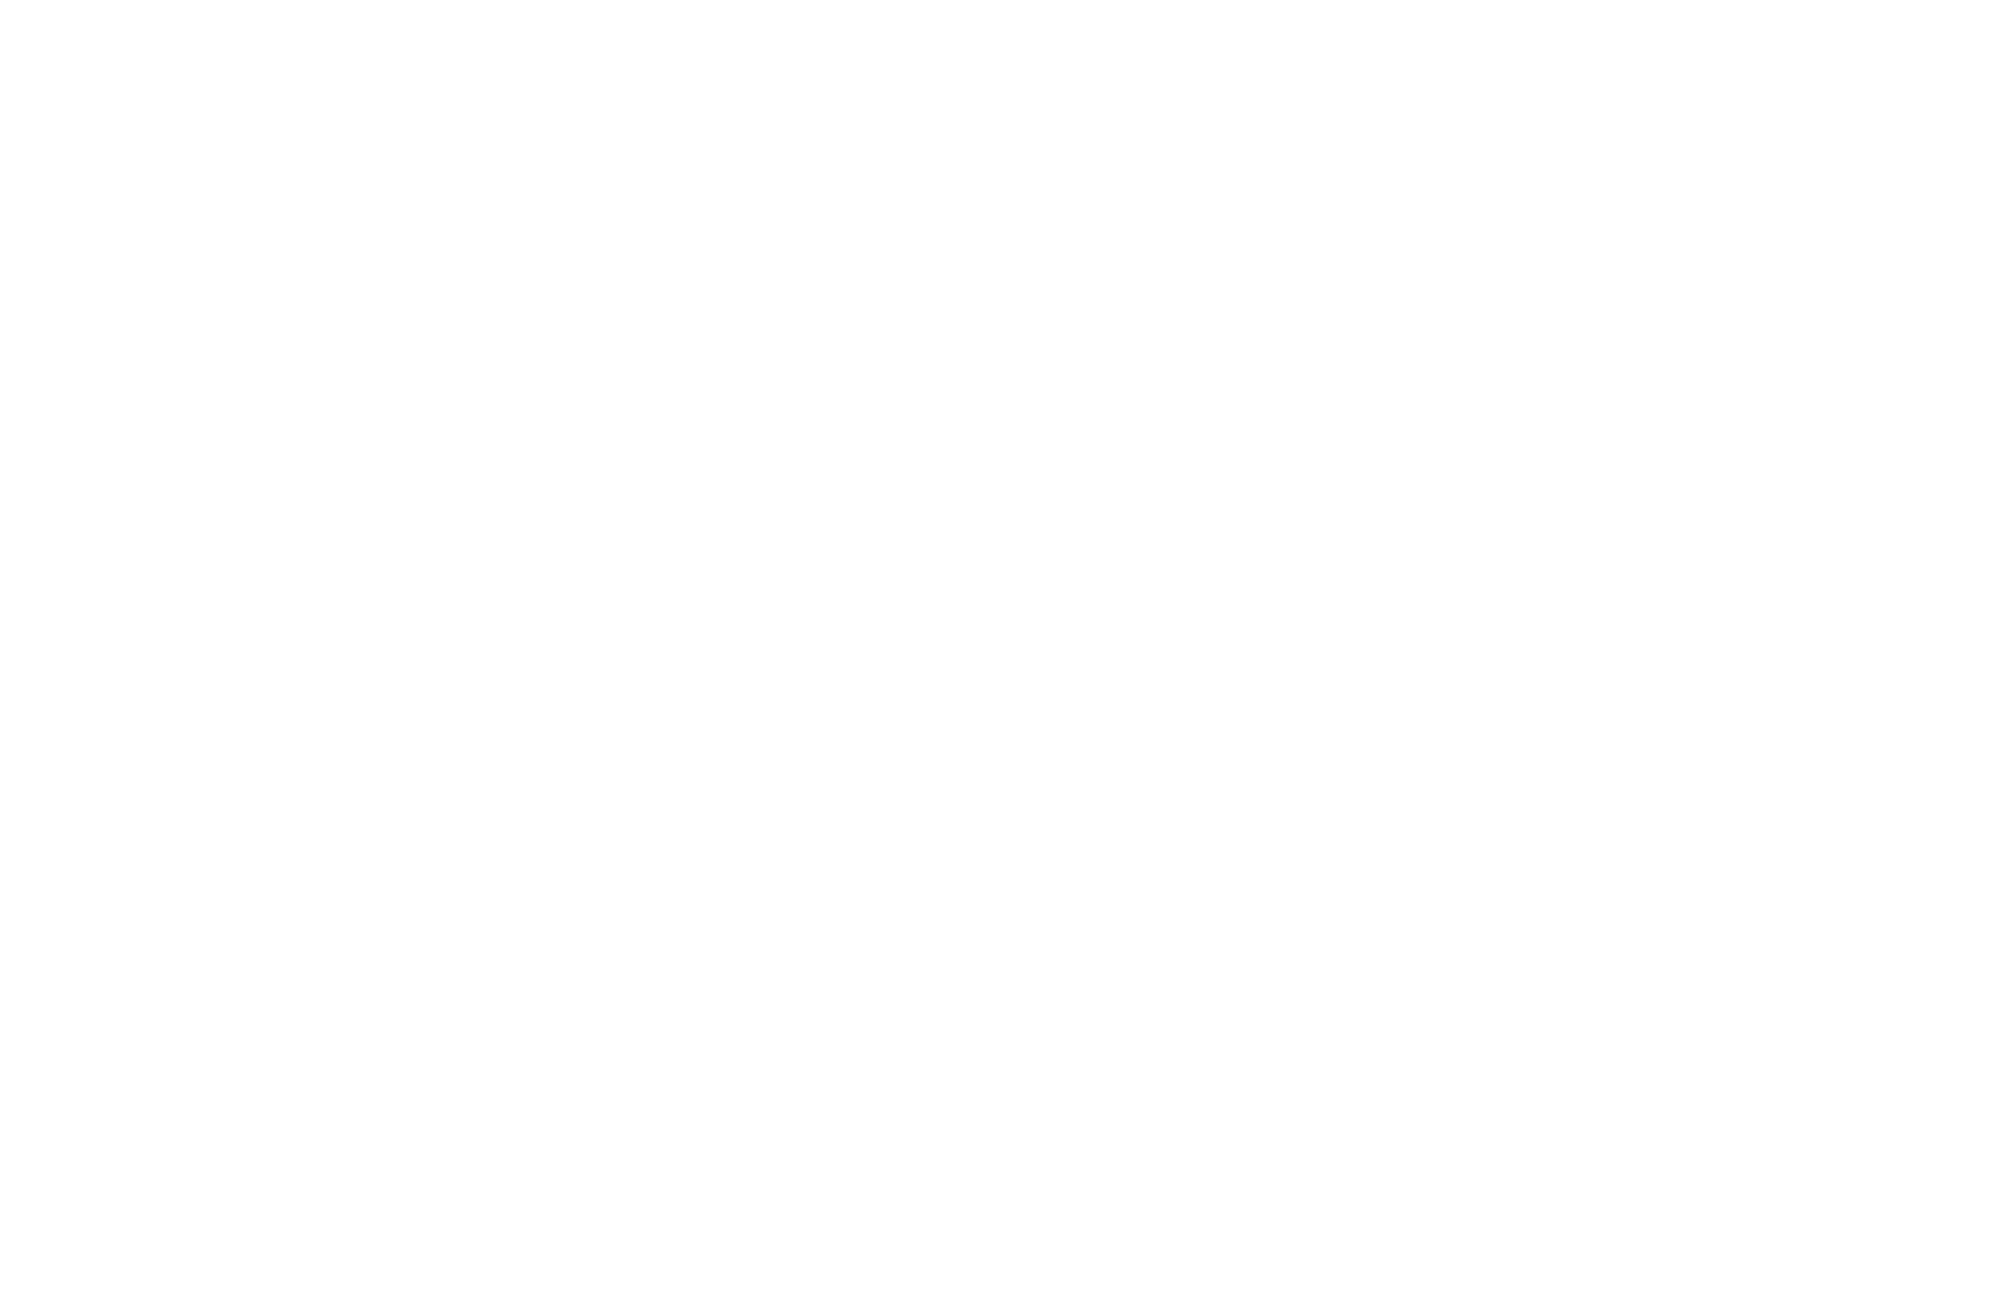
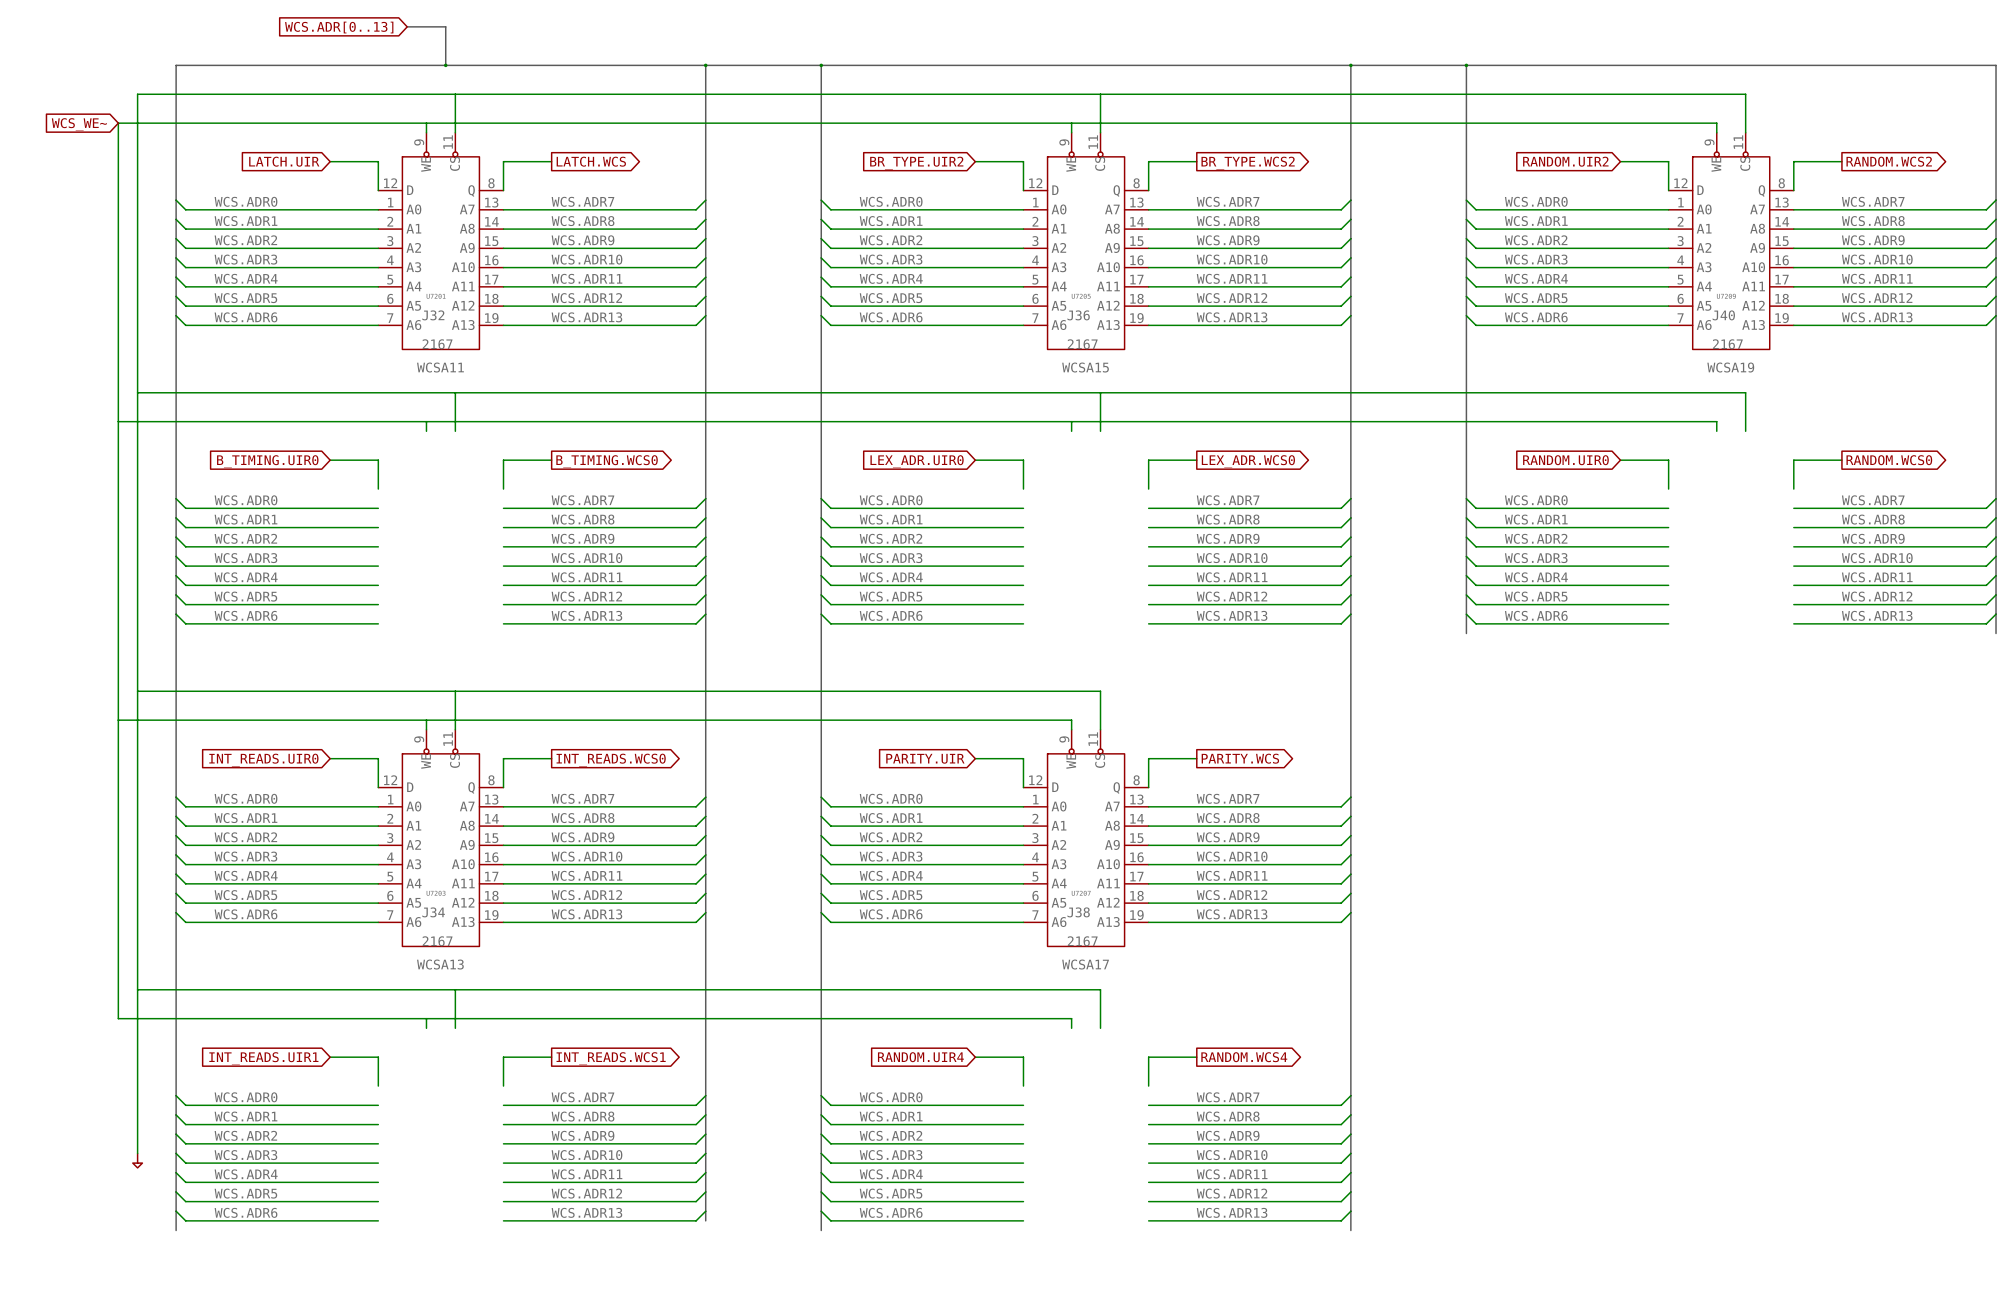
bus: none -> (407, 26) (445, 26) (445, 65)
global label: none -> WCS.ADR[0..13] (339, 27)
junction: none -> (445, 65)
bus: none -> (705, 65) (705, 1220)
junction: none -> (705, 65)
bus: none -> (821, 65) (821, 1230)
junction: none -> (821, 65)
bus: none -> (1350, 65) (1350, 1230)
junction: none -> (1350, 65)
bus: none -> (1466, 65) (1466, 633)
junction: none -> (1466, 65)
wire: none -> (455, 94) (455, 132)
wire: none -> (1100, 94) (1100, 132)
wire: none -> (426, 123) (426, 132)
wire: none -> (1071, 123) (1071, 132)
global label: none -> WCS_WE~ (79, 124)
wire: none -> (1716, 132) (1716, 123) (118, 123) (118, 1018) (1071, 1018) (1071, 1028)
wire: none -> (1745, 132) (1745, 94) (137, 94) (137, 1153)
global label: none -> LATCH.UIR (284, 161)
wire: none -> (330, 161) (378, 161) (378, 190)
wire: none -> (551, 161) (503, 161) (503, 190)
global label: none -> LATCH.WCS (591, 161)
wire: none -> (975, 161) (1023, 161) (1023, 190)
wire: none -> (1196, 161) (1148, 161) (1148, 190)
global label: none -> RANDOM.UIR2 (1565, 161)
wire: none -> (1620, 161) (1668, 161) (1668, 190)
wire: none -> (1841, 161) (1793, 161) (1793, 190)
global label: none -> RANDOM.WCS2 (1889, 161)
global label: none -> BR_TYPE.UIR2 (916, 163)
global label: none -> BR_TYPE.WCS2 (1248, 163)
wire: none -> (176, 200) (185, 209) (378, 209)
wire: none -> (705, 200) (696, 209) (503, 209)
wire: none -> (821, 200) (830, 209) (1023, 209)
wire: none -> (1350, 200) (1341, 209) (1148, 209)
wire: none -> (1466, 200) (1476, 209) (1668, 209)
wire: none -> (1996, 200) (1986, 209) (1793, 209)
label: none -> WCS.ADR0 (246, 201)
label: none -> WCS.ADR7 (582, 201)
label: none -> WCS.ADR0 (891, 201)
label: none -> WCS.ADR7 (1228, 201)
label: none -> WCS.ADR0 (1536, 201)
label: none -> WCS.ADR7 (1873, 201)
wire: none -> (176, 219) (185, 229) (378, 229)
wire: none -> (705, 219) (696, 229) (503, 229)
wire: none -> (821, 219) (830, 229) (1023, 229)
wire: none -> (1350, 219) (1341, 229) (1148, 229)
wire: none -> (1466, 219) (1476, 229) (1668, 229)
wire: none -> (1996, 219) (1986, 229) (1793, 229)
label: none -> WCS.ADR1 (245, 221)
label: none -> WCS.ADR8 (583, 221)
label: none -> WCS.ADR1 (891, 221)
label: none -> WCS.ADR8 (1228, 221)
label: none -> WCS.ADR1 (1536, 221)
label: none -> WCS.ADR8 (1873, 221)
wire: none -> (176, 238) (185, 248) (378, 248)
wire: none -> (705, 238) (696, 248) (503, 248)
wire: none -> (821, 238) (830, 248) (1023, 248)
wire: none -> (1350, 238) (1341, 248) (1148, 248)
wire: none -> (1466, 238) (1476, 248) (1668, 248)
wire: none -> (1996, 238) (1986, 248) (1793, 248)
label: none -> WCS.ADR2 (245, 240)
label: none -> WCS.ADR9 (583, 240)
label: none -> WCS.ADR2 (891, 240)
label: none -> WCS.ADR9 (1228, 240)
label: none -> WCS.ADR2 (1536, 240)
label: none -> WCS.ADR9 (1873, 240)
part: none -> 2167 (440, 241)
part: none -> 2167 (1086, 241)
part: none -> 2167 (1731, 241)
wire: none -> (176, 257) (185, 267) (378, 267)
wire: none -> (705, 257) (696, 267) (503, 267)
wire: none -> (821, 257) (830, 267) (1023, 267)
wire: none -> (1350, 257) (1341, 267) (1148, 267)
wire: none -> (1466, 257) (1476, 267) (1668, 267)
wire: none -> (1996, 257) (1986, 267) (1793, 267)
label: none -> WCS.ADR3 (245, 259)
label: none -> WCS.ADR10 (587, 259)
label: none -> WCS.ADR3 (891, 259)
label: none -> WCS.ADR10 (1232, 259)
label: none -> WCS.ADR3 (1536, 259)
label: none -> WCS.ADR10 (1877, 259)
wire: none -> (176, 277) (185, 286) (378, 286)
wire: none -> (705, 277) (696, 286) (503, 286)
wire: none -> (821, 277) (830, 286) (1023, 286)
wire: none -> (1350, 277) (1341, 286) (1148, 286)
wire: none -> (1466, 277) (1476, 286) (1668, 286)
wire: none -> (1996, 277) (1986, 286) (1793, 286)
label: none -> WCS.ADR4 (246, 278)
label: none -> WCS.ADR11 (586, 278)
label: none -> WCS.ADR4 (891, 278)
label: none -> WCS.ADR11 (1232, 278)
label: none -> WCS.ADR4 (1536, 278)
label: none -> WCS.ADR11 (1877, 278)
wire: none -> (176, 296) (185, 306) (378, 306)
wire: none -> (705, 296) (696, 306) (503, 306)
wire: none -> (821, 296) (830, 306) (1023, 306)
wire: none -> (1350, 296) (1341, 306) (1148, 306)
wire: none -> (1466, 296) (1476, 306) (1668, 306)
wire: none -> (1996, 296) (1986, 306) (1793, 306)
label: none -> WCS.ADR5 (245, 298)
label: none -> WCS.ADR12 (586, 298)
label: none -> WCS.ADR5 (891, 298)
label: none -> WCS.ADR12 (1232, 298)
label: none -> WCS.ADR5 (1536, 298)
label: none -> WCS.ADR12 (1877, 298)
wire: none -> (176, 315) (185, 325) (378, 325)
wire: none -> (705, 315) (696, 325) (503, 325)
wire: none -> (821, 315) (830, 325) (1023, 325)
wire: none -> (1350, 315) (1341, 325) (1148, 325)
wire: none -> (1466, 315) (1476, 325) (1668, 325)
wire: none -> (1996, 315) (1986, 325) (1793, 325)
label: none -> WCS.ADR6 (246, 317)
label: none -> WCS.ADR13 (586, 317)
label: none -> WCS.ADR6 (891, 317)
label: none -> WCS.ADR13 (1232, 317)
label: none -> WCS.ADR6 (1536, 317)
label: none -> WCS.ADR13 (1877, 317)
wire: none -> (137, 392) (1745, 392) (1745, 431)
wire: none -> (455, 392) (455, 431)
wire: none -> (1100, 392) (1100, 431)
wire: none -> (118, 421) (1716, 421) (1716, 431)
wire: none -> (426, 421) (426, 431)
wire: none -> (1071, 421) (1071, 431)
wire: none -> (330, 460) (378, 460) (378, 489)
wire: none -> (551, 460) (503, 460) (503, 489)
wire: none -> (975, 460) (1023, 460) (1023, 489)
wire: none -> (1196, 460) (1148, 460) (1148, 489)
global label: none -> RANDOM.UIR0 (1565, 460)
wire: none -> (1620, 460) (1668, 460) (1668, 489)
wire: none -> (1841, 460) (1793, 460) (1793, 489)
global label: none -> RANDOM.WCS0 (1889, 460)
global label: none -> B_TIMING.UIR0 (267, 461)
global label: none -> B_TIMING.WCS0 (607, 461)
global label: none -> LEX_ADR.UIR0 (917, 461)
global label: none -> LEX_ADR.WCS0 (1248, 461)
wire: none -> (176, 498) (185, 508) (378, 508)
wire: none -> (705, 498) (696, 508) (503, 508)
wire: none -> (821, 498) (830, 508) (1023, 508)
wire: none -> (1350, 498) (1341, 508) (1148, 508)
wire: none -> (1466, 498) (1476, 508) (1668, 508)
wire: none -> (1996, 498) (1986, 508) (1793, 508)
label: none -> WCS.ADR0 (246, 500)
label: none -> WCS.ADR7 (582, 500)
label: none -> WCS.ADR0 (891, 500)
label: none -> WCS.ADR7 (1228, 500)
label: none -> WCS.ADR0 (1536, 500)
label: none -> WCS.ADR7 (1873, 500)
wire: none -> (176, 517) (185, 527) (378, 527)
wire: none -> (705, 517) (696, 527) (503, 527)
wire: none -> (821, 517) (830, 527) (1023, 527)
wire: none -> (1350, 517) (1341, 527) (1148, 527)
wire: none -> (1466, 517) (1476, 527) (1668, 527)
wire: none -> (1996, 517) (1986, 527) (1793, 527)
label: none -> WCS.ADR1 (245, 519)
label: none -> WCS.ADR8 (583, 519)
label: none -> WCS.ADR1 (891, 519)
label: none -> WCS.ADR8 (1228, 519)
label: none -> WCS.ADR1 (1536, 519)
label: none -> WCS.ADR8 (1873, 519)
wire: none -> (176, 537) (185, 546) (378, 546)
wire: none -> (705, 537) (696, 546) (503, 546)
wire: none -> (821, 537) (830, 546) (1023, 546)
wire: none -> (1350, 537) (1341, 546) (1148, 546)
wire: none -> (1466, 537) (1476, 546) (1668, 546)
wire: none -> (1996, 537) (1986, 546) (1793, 546)
label: none -> WCS.ADR2 (245, 538)
label: none -> WCS.ADR9 (583, 538)
label: none -> WCS.ADR2 (891, 538)
label: none -> WCS.ADR9 (1228, 538)
label: none -> WCS.ADR2 (1536, 538)
label: none -> WCS.ADR9 (1873, 538)
wire: none -> (176, 556) (185, 566) (378, 566)
wire: none -> (705, 556) (696, 566) (503, 566)
wire: none -> (821, 556) (830, 566) (1023, 566)
wire: none -> (1350, 556) (1341, 566) (1148, 566)
wire: none -> (1466, 556) (1476, 566) (1668, 566)
wire: none -> (1996, 556) (1986, 566) (1793, 566)
label: none -> WCS.ADR3 (245, 558)
label: none -> WCS.ADR10 (587, 558)
label: none -> WCS.ADR3 (891, 558)
label: none -> WCS.ADR10 (1232, 558)
label: none -> WCS.ADR3 (1536, 558)
label: none -> WCS.ADR10 (1877, 558)
wire: none -> (176, 575) (185, 585) (378, 585)
wire: none -> (705, 575) (696, 585) (503, 585)
wire: none -> (821, 575) (830, 585) (1023, 585)
wire: none -> (1350, 575) (1341, 585) (1148, 585)
wire: none -> (1466, 575) (1476, 585) (1668, 585)
wire: none -> (1996, 575) (1986, 585) (1793, 585)
label: none -> WCS.ADR4 (246, 577)
label: none -> WCS.ADR11 (586, 577)
label: none -> WCS.ADR4 (891, 577)
label: none -> WCS.ADR11 (1232, 577)
label: none -> WCS.ADR4 (1536, 577)
label: none -> WCS.ADR11 (1877, 577)
wire: none -> (176, 594) (185, 604) (378, 604)
wire: none -> (705, 594) (696, 604) (503, 604)
wire: none -> (821, 594) (830, 604) (1023, 604)
wire: none -> (1350, 594) (1341, 604) (1148, 604)
wire: none -> (1466, 594) (1476, 604) (1668, 604)
wire: none -> (1996, 594) (1986, 604) (1793, 604)
label: none -> WCS.ADR5 (245, 596)
label: none -> WCS.ADR12 (586, 596)
label: none -> WCS.ADR5 (891, 596)
label: none -> WCS.ADR12 (1232, 596)
label: none -> WCS.ADR5 (1536, 596)
label: none -> WCS.ADR12 (1877, 596)
wire: none -> (176, 614) (185, 623) (378, 623)
wire: none -> (705, 614) (696, 623) (503, 623)
wire: none -> (821, 614) (830, 623) (1023, 623)
wire: none -> (1350, 614) (1341, 623) (1148, 623)
wire: none -> (1466, 614) (1476, 623) (1668, 623)
wire: none -> (1996, 614) (1986, 623) (1793, 623)
label: none -> WCS.ADR6 (246, 615)
label: none -> WCS.ADR13 (586, 615)
label: none -> WCS.ADR6 (891, 615)
label: none -> WCS.ADR13 (1232, 615)
label: none -> WCS.ADR6 (1536, 615)
label: none -> WCS.ADR13 (1877, 615)
bus: none -> (1996, 633) (1996, 65) (176, 65) (176, 1230)
wire: none -> (137, 691) (1100, 691) (1100, 729)
wire: none -> (455, 691) (455, 729)
wire: none -> (118, 720) (1071, 720) (1071, 729)
wire: none -> (426, 720) (426, 729)
wire: none -> (330, 758) (378, 758) (378, 787)
wire: none -> (551, 758) (503, 758) (503, 787)
global label: none -> PARITY.UIR (925, 758)
wire: none -> (975, 758) (1023, 758) (1023, 787)
wire: none -> (1196, 758) (1148, 758) (1148, 787)
global label: none -> PARITY.WCS (1240, 758)
global label: none -> INT_READS.UIR0 (263, 760)
global label: none -> INT_READS.WCS0 (611, 760)
wire: none -> (176, 797) (185, 806) (378, 806)
wire: none -> (705, 797) (696, 806) (503, 806)
wire: none -> (821, 797) (830, 806) (1023, 806)
wire: none -> (1350, 797) (1341, 806) (1148, 806)
label: none -> WCS.ADR0 (246, 798)
label: none -> WCS.ADR7 (582, 798)
label: none -> WCS.ADR0 (891, 798)
label: none -> WCS.ADR7 (1228, 798)
wire: none -> (176, 816) (185, 826) (378, 826)
wire: none -> (705, 816) (696, 826) (503, 826)
wire: none -> (821, 816) (830, 826) (1023, 826)
wire: none -> (1350, 816) (1341, 826) (1148, 826)
label: none -> WCS.ADR1 (245, 818)
label: none -> WCS.ADR8 (583, 818)
label: none -> WCS.ADR1 (891, 818)
label: none -> WCS.ADR8 (1228, 818)
wire: none -> (176, 835) (185, 845) (378, 845)
wire: none -> (705, 835) (696, 845) (503, 845)
wire: none -> (821, 835) (830, 845) (1023, 845)
wire: none -> (1350, 835) (1341, 845) (1148, 845)
label: none -> WCS.ADR2 (245, 837)
label: none -> WCS.ADR9 (583, 837)
label: none -> WCS.ADR2 (891, 837)
label: none -> WCS.ADR9 (1228, 837)
part: none -> 2167 (440, 838)
part: none -> 2167 (1086, 838)
wire: none -> (176, 854) (185, 864) (378, 864)
wire: none -> (705, 854) (696, 864) (503, 864)
wire: none -> (821, 854) (830, 864) (1023, 864)
wire: none -> (1350, 854) (1341, 864) (1148, 864)
label: none -> WCS.ADR3 (245, 856)
label: none -> WCS.ADR10 (587, 856)
label: none -> WCS.ADR3 (891, 856)
label: none -> WCS.ADR10 (1232, 856)
wire: none -> (176, 874) (185, 883) (378, 883)
wire: none -> (705, 874) (696, 883) (503, 883)
wire: none -> (821, 874) (830, 883) (1023, 883)
wire: none -> (1350, 874) (1341, 883) (1148, 883)
label: none -> WCS.ADR4 (246, 875)
label: none -> WCS.ADR11 (586, 875)
label: none -> WCS.ADR4 (891, 875)
label: none -> WCS.ADR11 (1232, 875)
wire: none -> (176, 893) (185, 903) (378, 903)
wire: none -> (705, 893) (696, 903) (503, 903)
wire: none -> (821, 893) (830, 903) (1023, 903)
wire: none -> (1350, 893) (1341, 903) (1148, 903)
label: none -> WCS.ADR5 (245, 895)
label: none -> WCS.ADR12 (586, 895)
label: none -> WCS.ADR5 (891, 895)
label: none -> WCS.ADR12 (1232, 895)
wire: none -> (176, 912) (185, 922) (378, 922)
wire: none -> (705, 912) (696, 922) (503, 922)
wire: none -> (821, 912) (830, 922) (1023, 922)
wire: none -> (1350, 912) (1341, 922) (1148, 922)
label: none -> WCS.ADR6 (246, 914)
label: none -> WCS.ADR13 (586, 914)
label: none -> WCS.ADR6 (891, 914)
label: none -> WCS.ADR13 (1232, 914)
wire: none -> (137, 989) (1100, 989) (1100, 1028)
wire: none -> (455, 989) (455, 1028)
wire: none -> (426, 1018) (426, 1028)
wire: none -> (330, 1057) (378, 1057) (378, 1086)
wire: none -> (551, 1057) (503, 1057) (503, 1086)
global label: none -> RANDOM.UIR4 (920, 1057)
wire: none -> (975, 1057) (1023, 1057) (1023, 1086)
wire: none -> (1196, 1057) (1148, 1057) (1148, 1086)
global label: none -> RANDOM.WCS4 (1244, 1057)
global label: none -> INT_READS.UIR1 (263, 1058)
global label: none -> INT_READS.WCS1 (611, 1058)
wire: none -> (176, 1095) (185, 1105) (378, 1105)
wire: none -> (705, 1095) (696, 1105) (503, 1105)
wire: none -> (821, 1095) (830, 1105) (1023, 1105)
wire: none -> (1350, 1095) (1341, 1105) (1148, 1105)
label: none -> WCS.ADR0 (246, 1097)
label: none -> WCS.ADR7 (582, 1097)
label: none -> WCS.ADR0 (891, 1097)
label: none -> WCS.ADR7 (1228, 1097)
wire: none -> (176, 1114) (185, 1124) (378, 1124)
wire: none -> (705, 1114) (696, 1124) (503, 1124)
wire: none -> (821, 1114) (830, 1124) (1023, 1124)
wire: none -> (1350, 1114) (1341, 1124) (1148, 1124)
label: none -> WCS.ADR1 (245, 1116)
label: none -> WCS.ADR8 (583, 1116)
label: none -> WCS.ADR1 (891, 1116)
label: none -> WCS.ADR8 (1228, 1116)
wire: none -> (176, 1134) (185, 1143) (378, 1143)
wire: none -> (705, 1134) (696, 1143) (503, 1143)
wire: none -> (821, 1134) (830, 1143) (1023, 1143)
wire: none -> (1350, 1134) (1341, 1143) (1148, 1143)
label: none -> WCS.ADR2 (245, 1135)
label: none -> WCS.ADR9 (583, 1135)
label: none -> WCS.ADR2 (891, 1135)
label: none -> WCS.ADR9 (1228, 1135)
wire: none -> (176, 1153) (185, 1163) (378, 1163)
wire: none -> (705, 1153) (696, 1163) (503, 1163)
wire: none -> (821, 1153) (830, 1163) (1023, 1163)
wire: none -> (1350, 1153) (1341, 1163) (1148, 1163)
label: none -> WCS.ADR3 (245, 1155)
label: none -> WCS.ADR10 (587, 1155)
label: none -> WCS.ADR3 (891, 1155)
label: none -> WCS.ADR10 (1232, 1155)
power symbol: none -> (137, 1160)
wire: none -> (176, 1172) (185, 1182) (378, 1182)
wire: none -> (705, 1172) (696, 1182) (503, 1182)
wire: none -> (821, 1172) (830, 1182) (1023, 1182)
wire: none -> (1350, 1172) (1341, 1182) (1148, 1182)
label: none -> WCS.ADR4 (246, 1174)
label: none -> WCS.ADR11 (586, 1174)
label: none -> WCS.ADR4 (891, 1174)
label: none -> WCS.ADR11 (1232, 1174)
wire: none -> (176, 1191) (185, 1201) (378, 1201)
wire: none -> (705, 1191) (696, 1201) (503, 1201)
wire: none -> (821, 1191) (830, 1201) (1023, 1201)
wire: none -> (1350, 1191) (1341, 1201) (1148, 1201)
label: none -> WCS.ADR5 (245, 1193)
label: none -> WCS.ADR12 (586, 1193)
label: none -> WCS.ADR5 (891, 1193)
label: none -> WCS.ADR12 (1232, 1193)
wire: none -> (176, 1211) (185, 1220) (378, 1220)
wire: none -> (705, 1211) (696, 1220) (503, 1220)
wire: none -> (821, 1211) (830, 1220) (1023, 1220)
wire: none -> (1350, 1211) (1341, 1220) (1148, 1220)
label: none -> WCS.ADR6 (246, 1212)
label: none -> WCS.ADR13 (586, 1212)
label: none -> WCS.ADR6 (891, 1212)
label: none -> WCS.ADR13 (1232, 1212)

